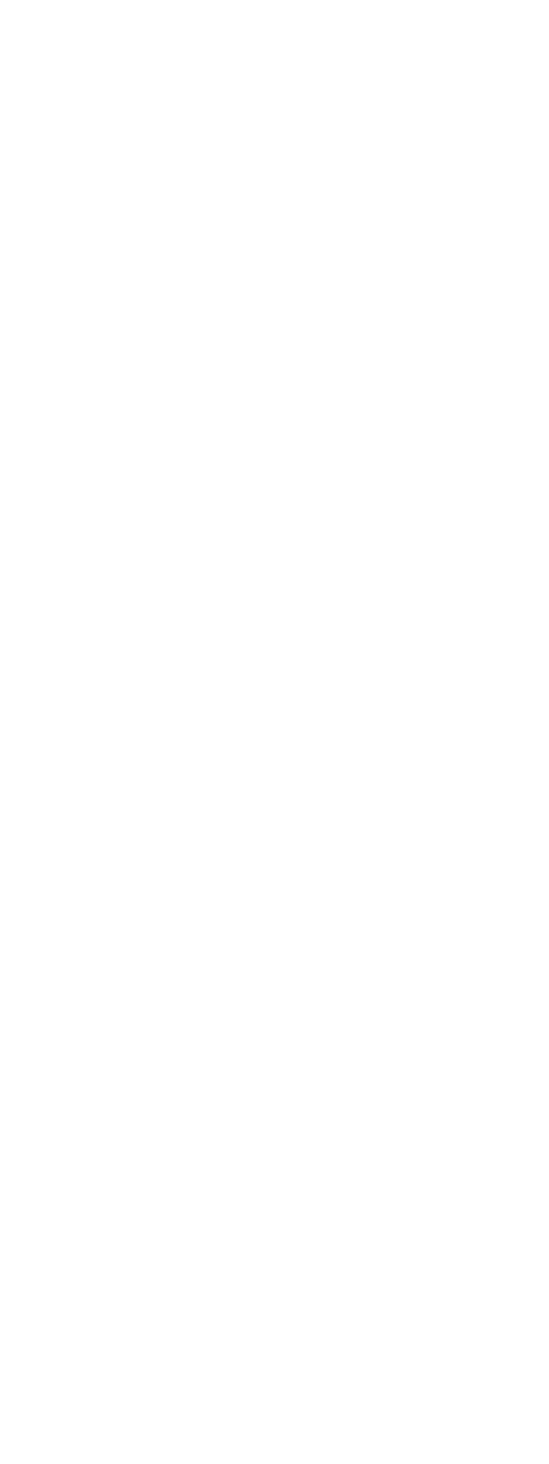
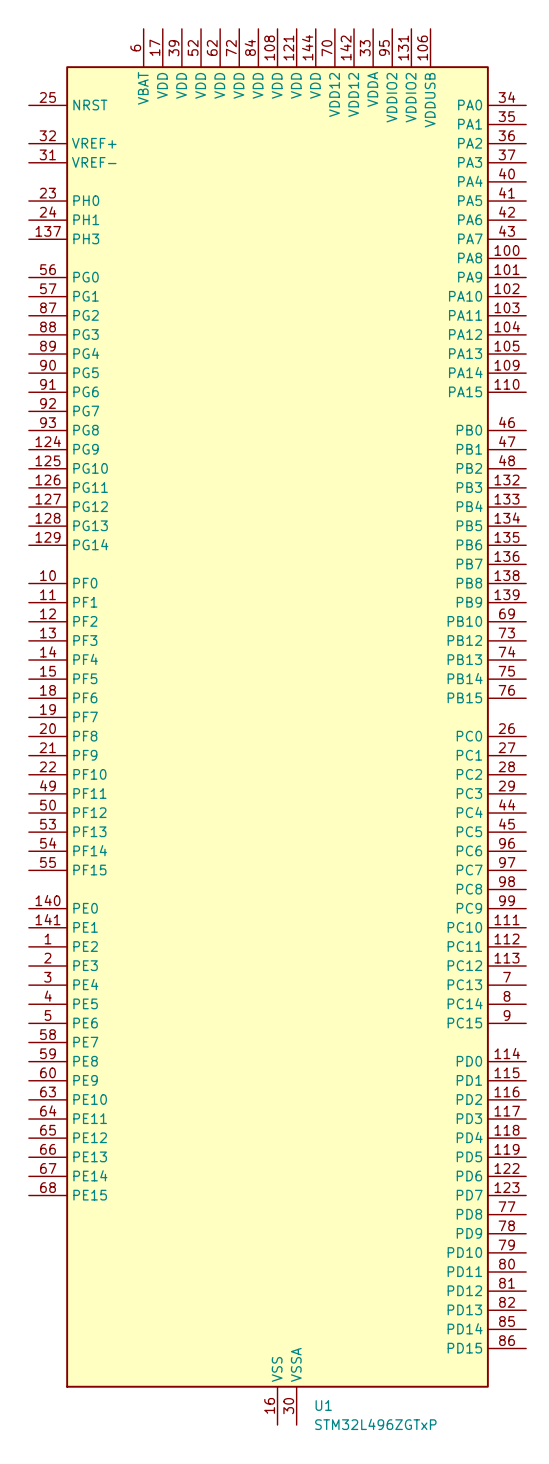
U1: none -> STM32L496ZGTxP (277, 726)

